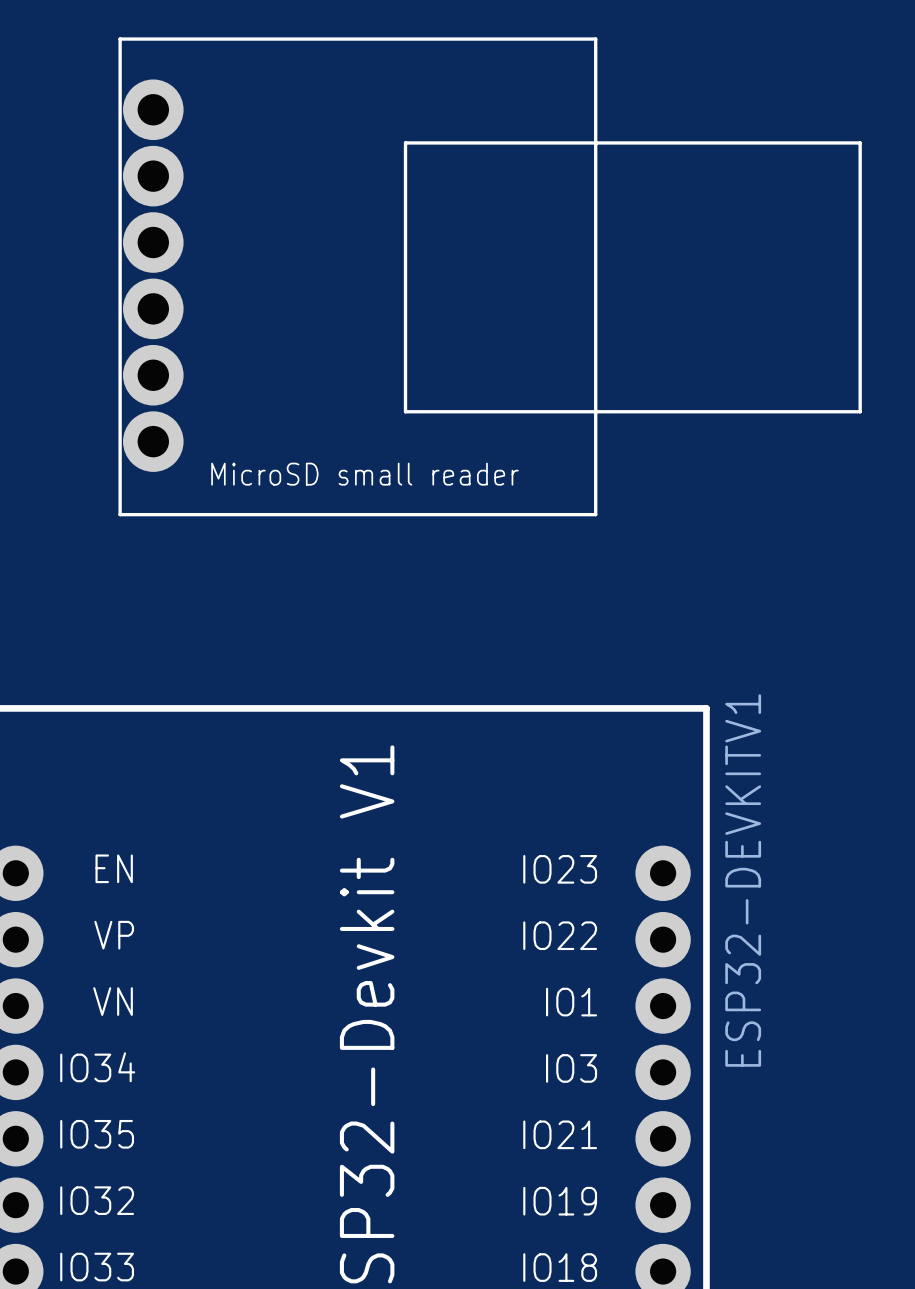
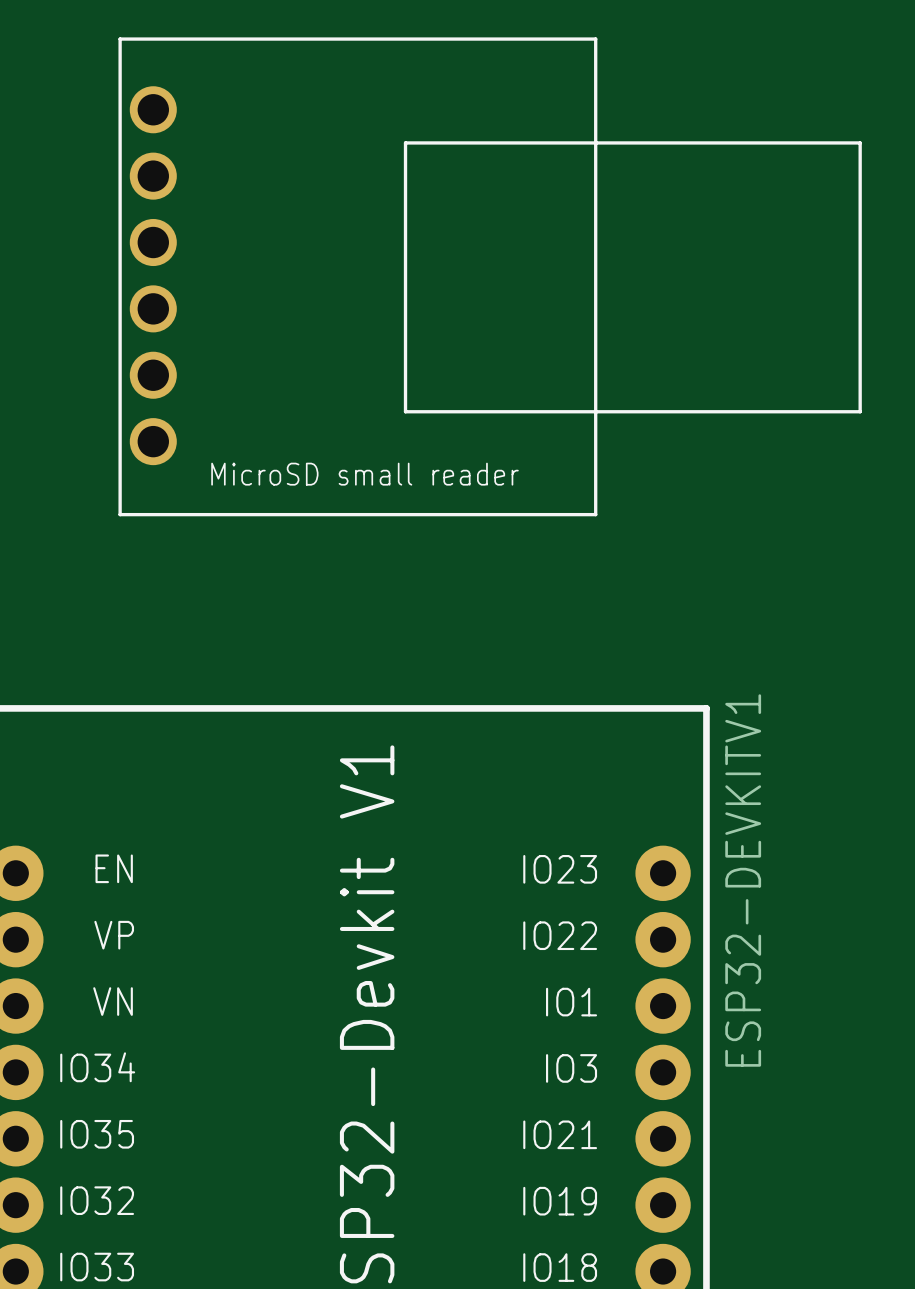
part footprint: [118, 37, 862, 517] -> [118, 37, 862, 517]

